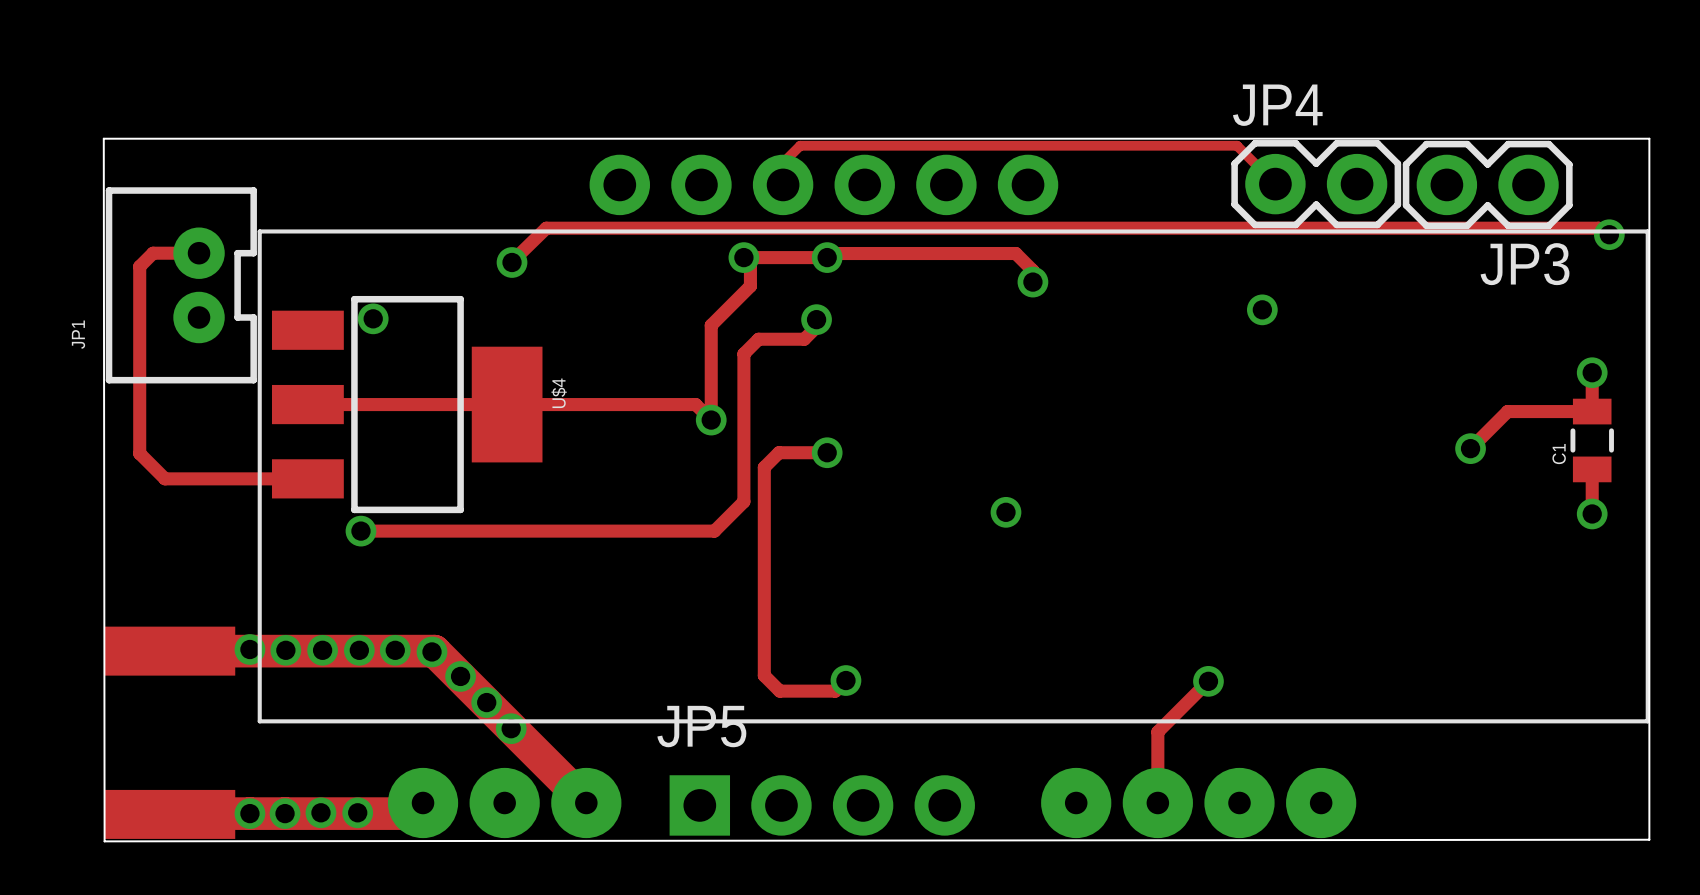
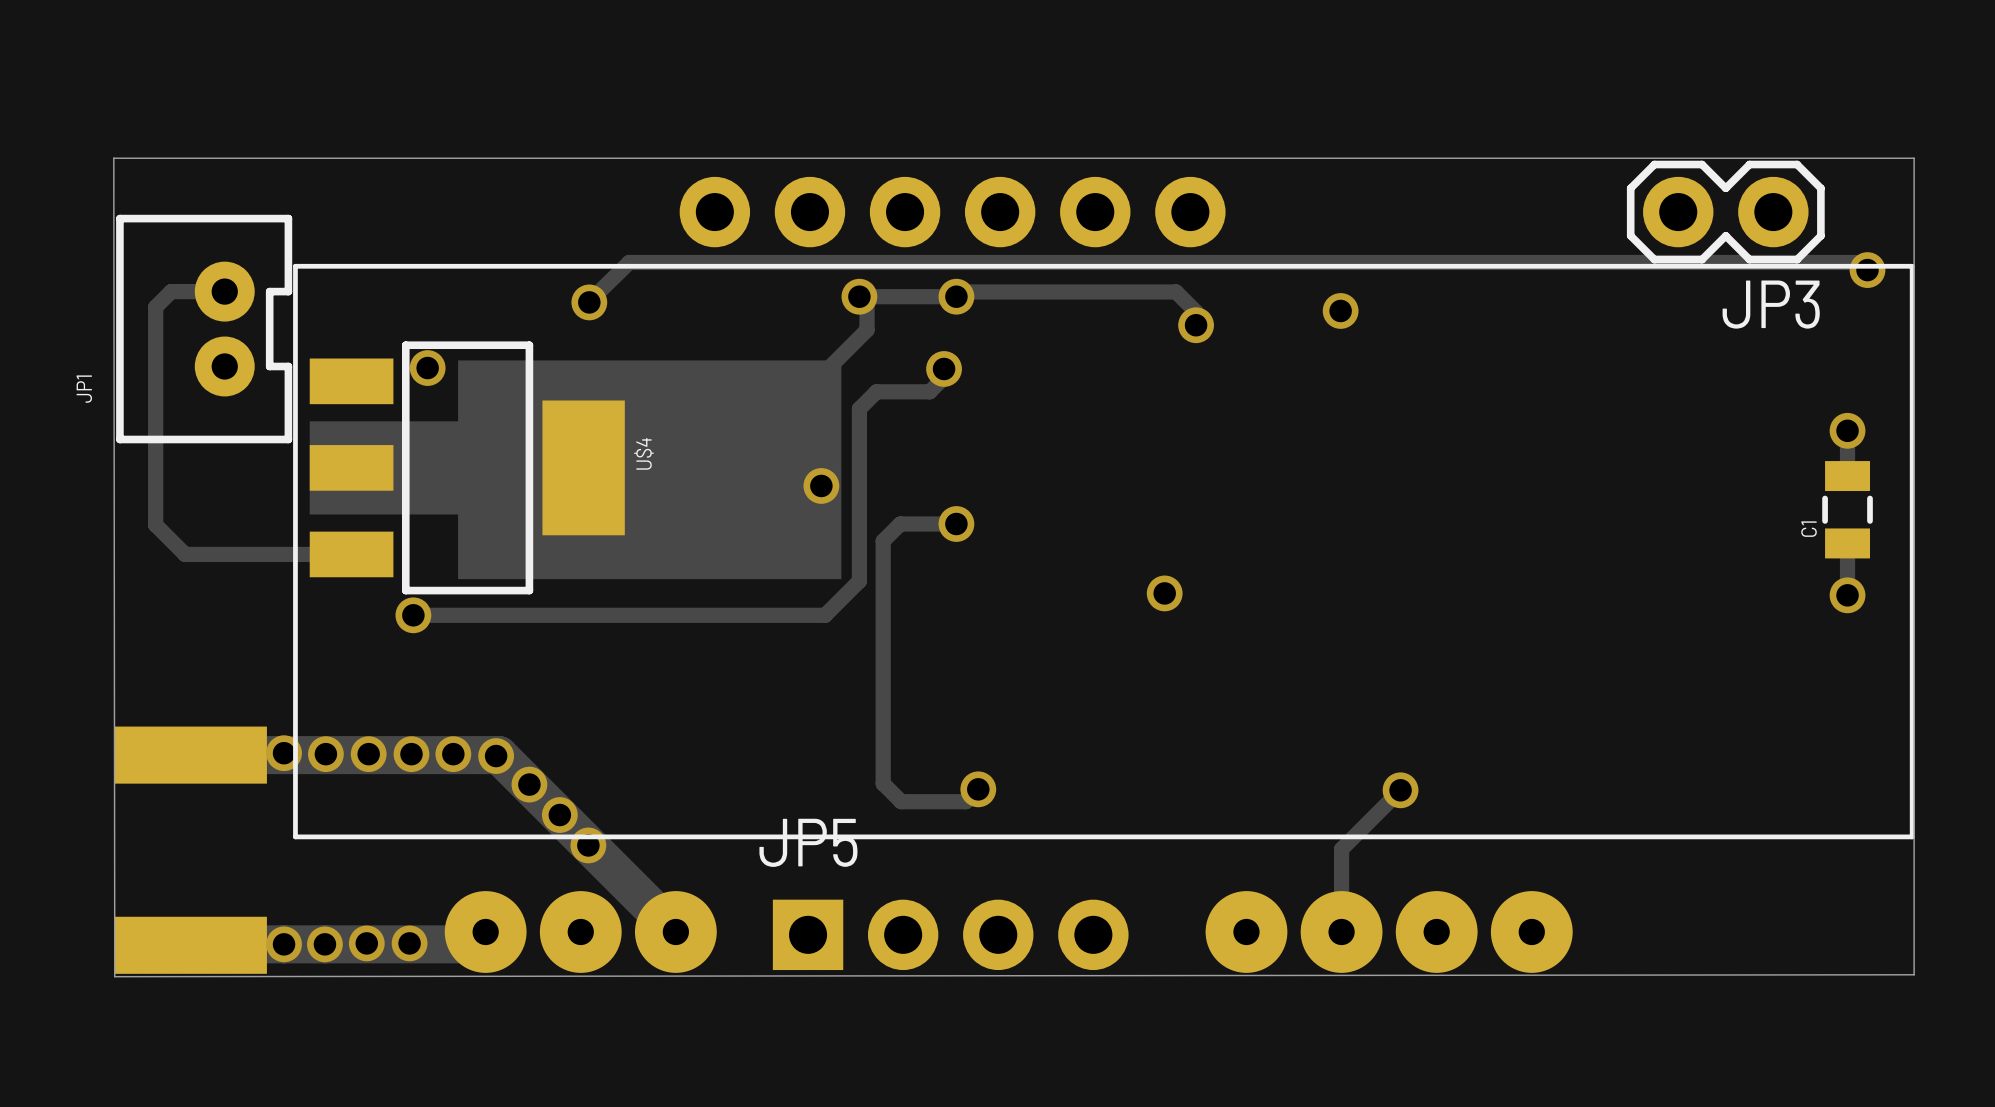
track: (1275, 184) (1237, 145) (800, 145) (783, 162) (783, 184) -> none
JP4: (1316, 184) -> none
via position: (1262, 309) -> (1340, 310)
drawing: none -> [309, 360, 842, 580]
track: (1592, 411) (1507, 411) (1470, 448) -> none
via: (1470, 448) -> none

